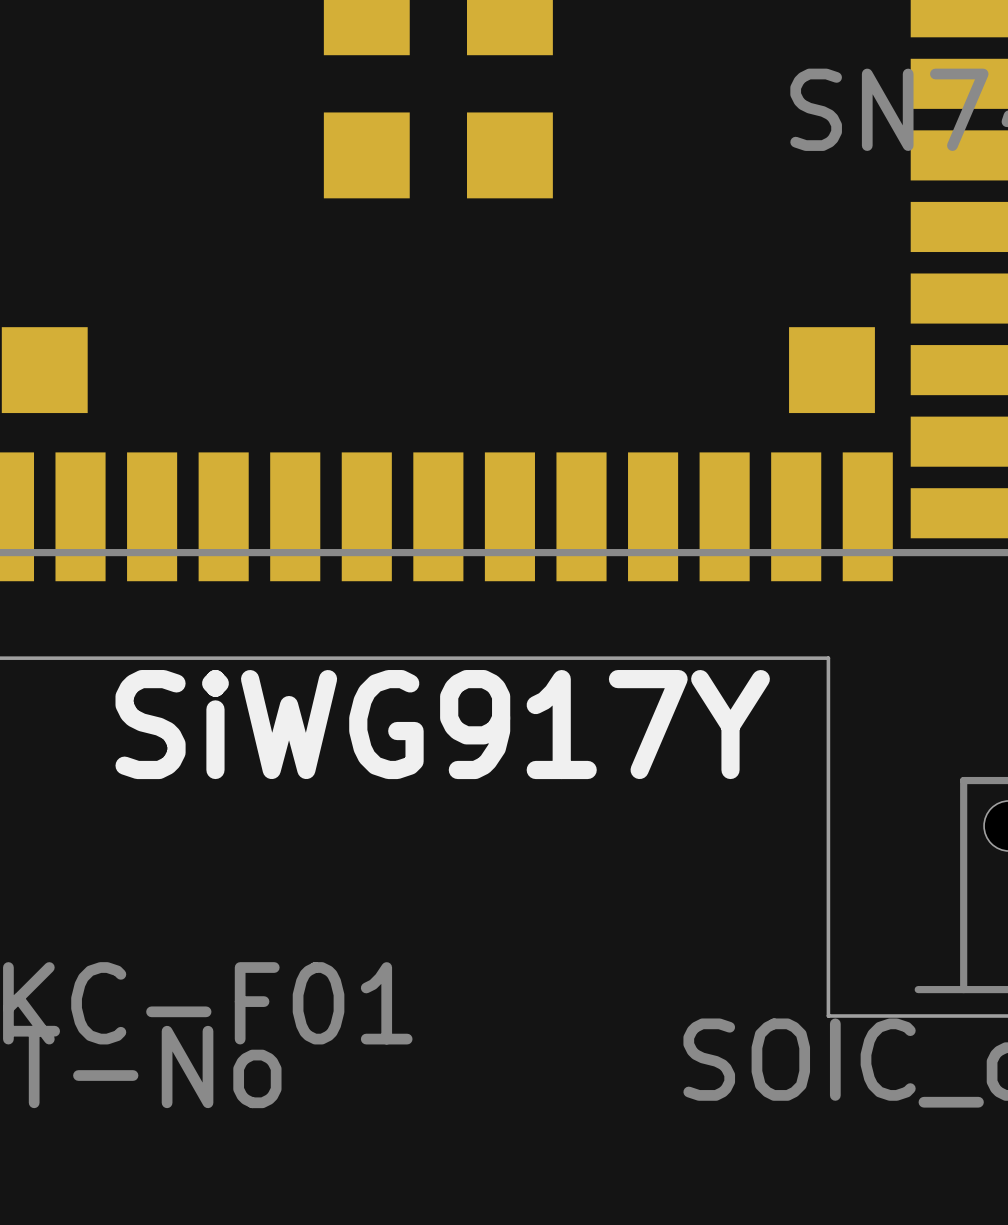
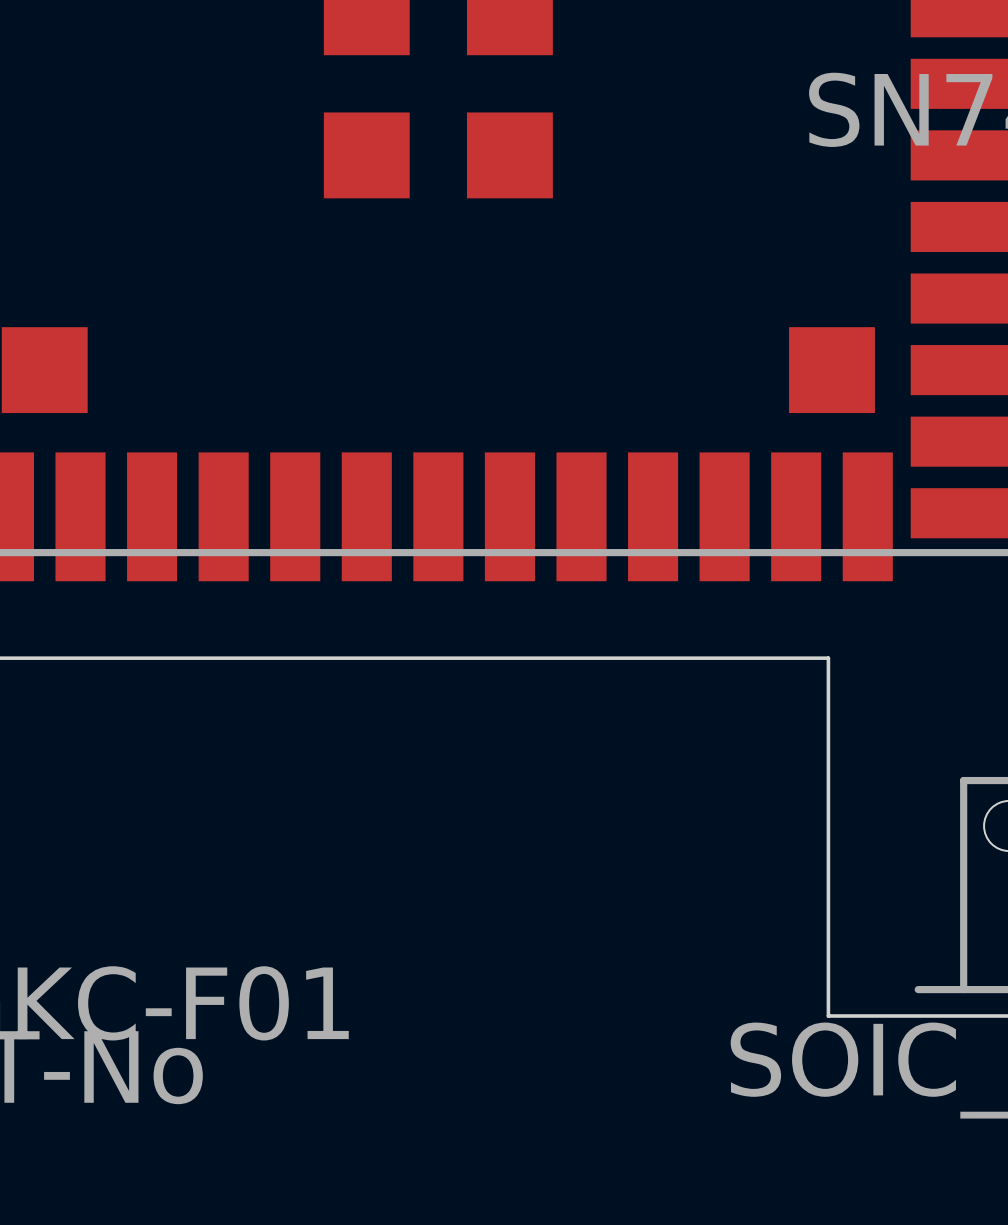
part value: SiWG917Y (442, 724) -> none

